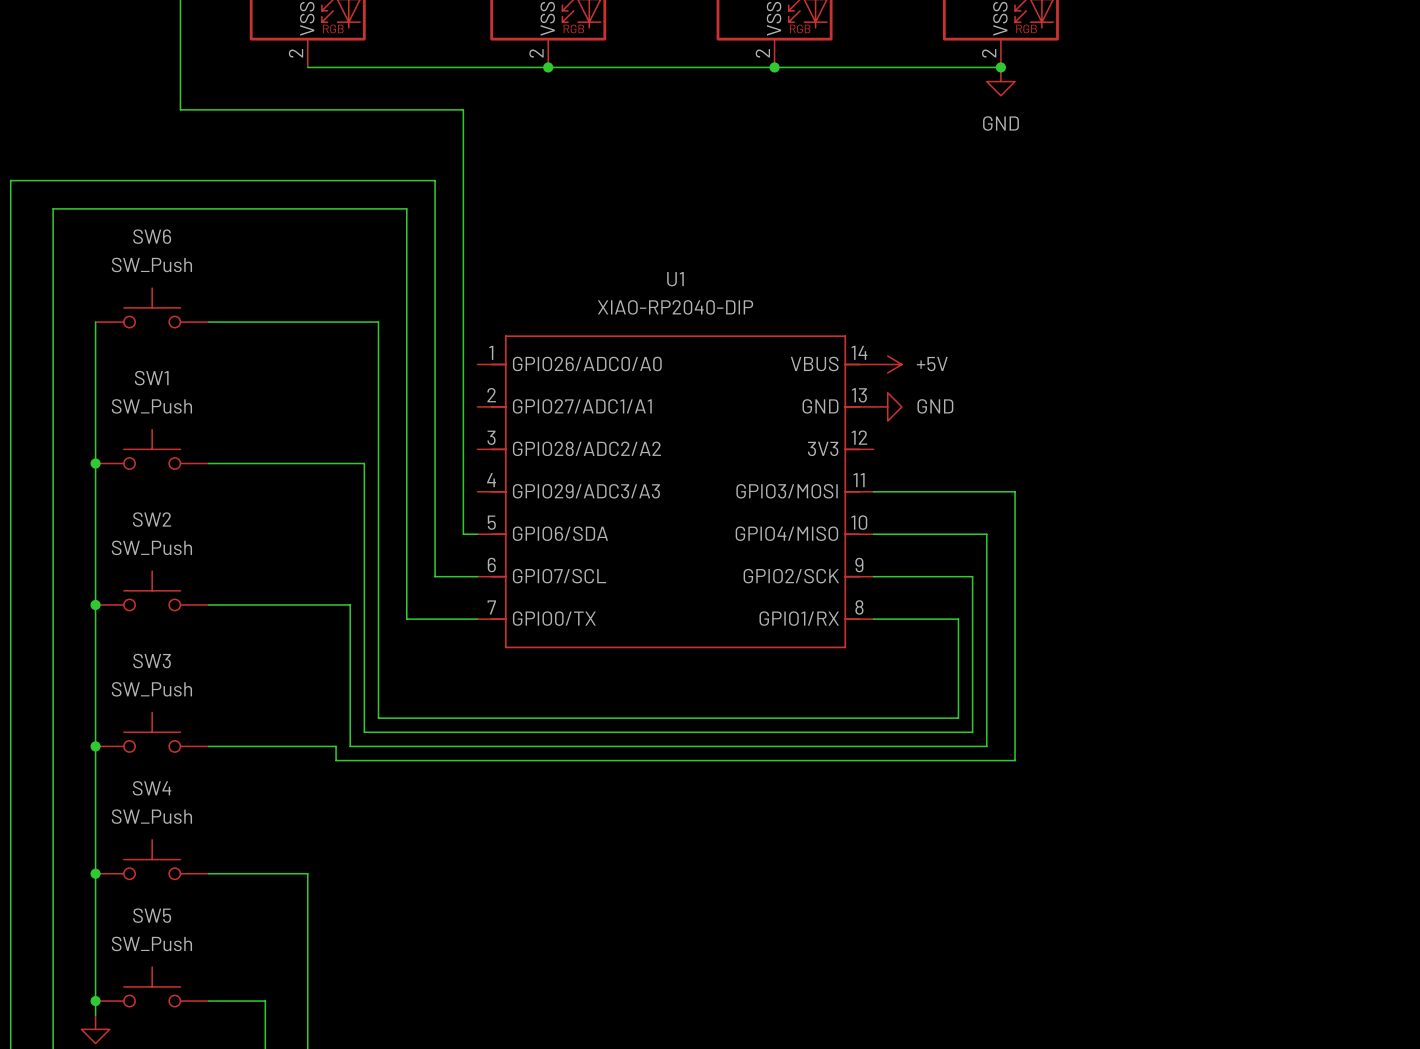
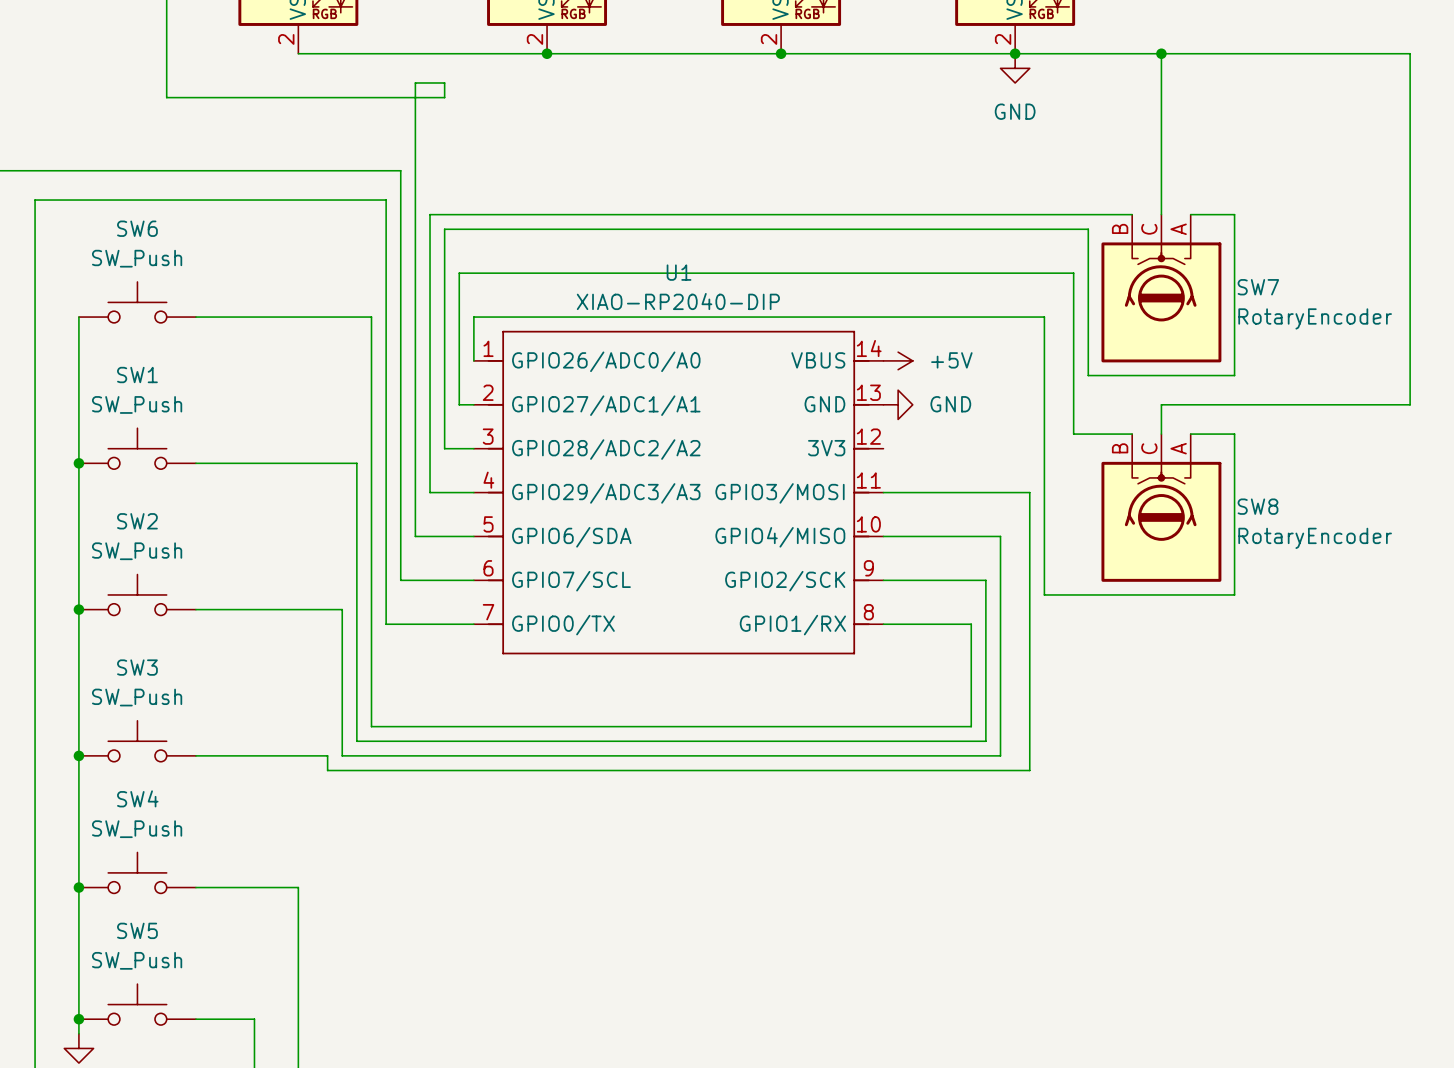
wire: none -> (1015, 53) (1410, 53) (1410, 404) (1161, 404) (1161, 434)
wire: none -> (1161, 53) (1161, 214)
junction: none -> (1161, 53)
wire: (449, 109) (463, 109) (463, 279) -> (444, 97) (444, 82) (415, 82) (415, 536) (459, 536)
wire: (406, 180) (435, 180) (435, 223) -> (400, 170) (400, 200)
wire: (392, 208) (406, 208) -> (386, 200) (386, 624) (400, 624)
wire: none -> (430, 214) (1132, 214)
wire: none -> (1190, 214) (1234, 214) (1234, 375) (1088, 375) (1088, 229) (444, 229) (444, 448) (473, 448)
wire: none -> (459, 273) (1073, 273) (1073, 434) (1132, 434)
SW7: none -> RotaryEncoder (1161, 288)
wire: none -> (473, 360) (473, 317) (1044, 317) (1044, 594) (1234, 594) (1234, 434) (1190, 434)
wire: (463, 406) (463, 534) -> (459, 404) (473, 404)
wire: (435, 491) (435, 576) -> (430, 492) (473, 492)
SW8: none -> RotaryEncoder (1161, 507)
wire: (406, 576) (406, 619) -> (400, 580) (430, 580)

